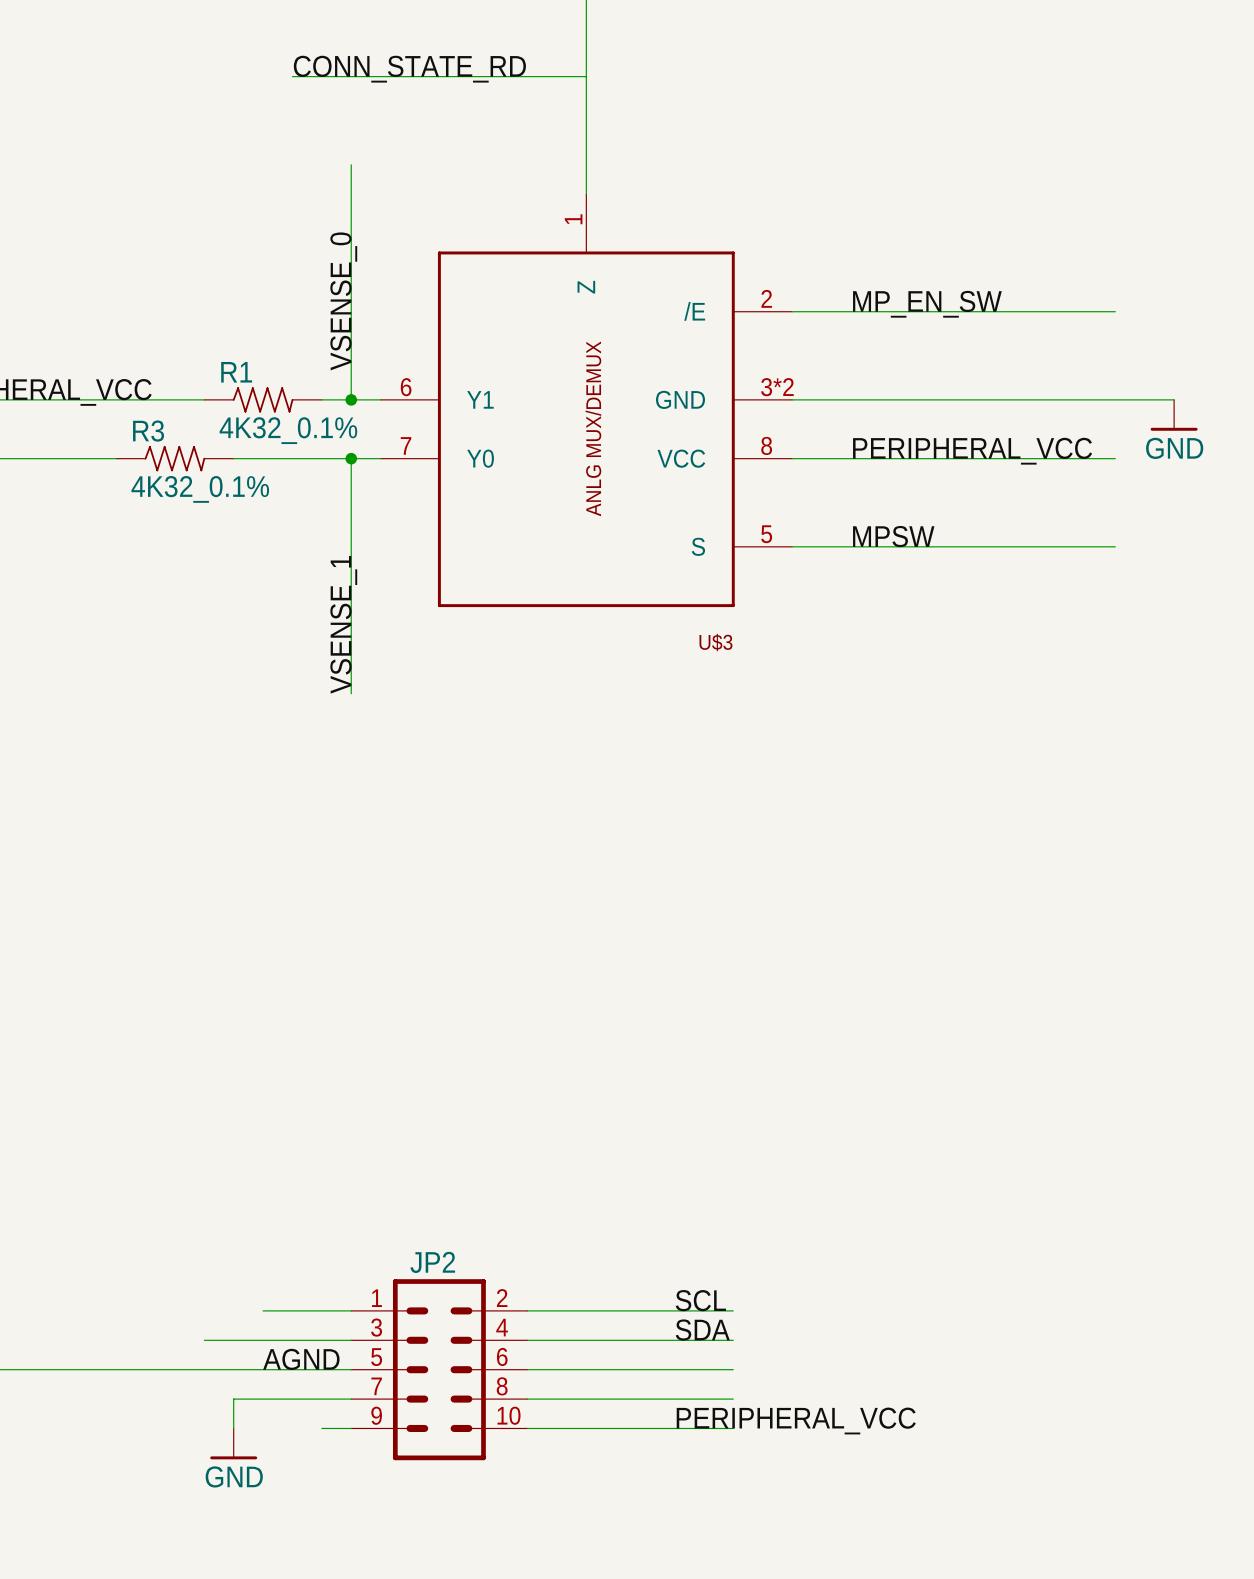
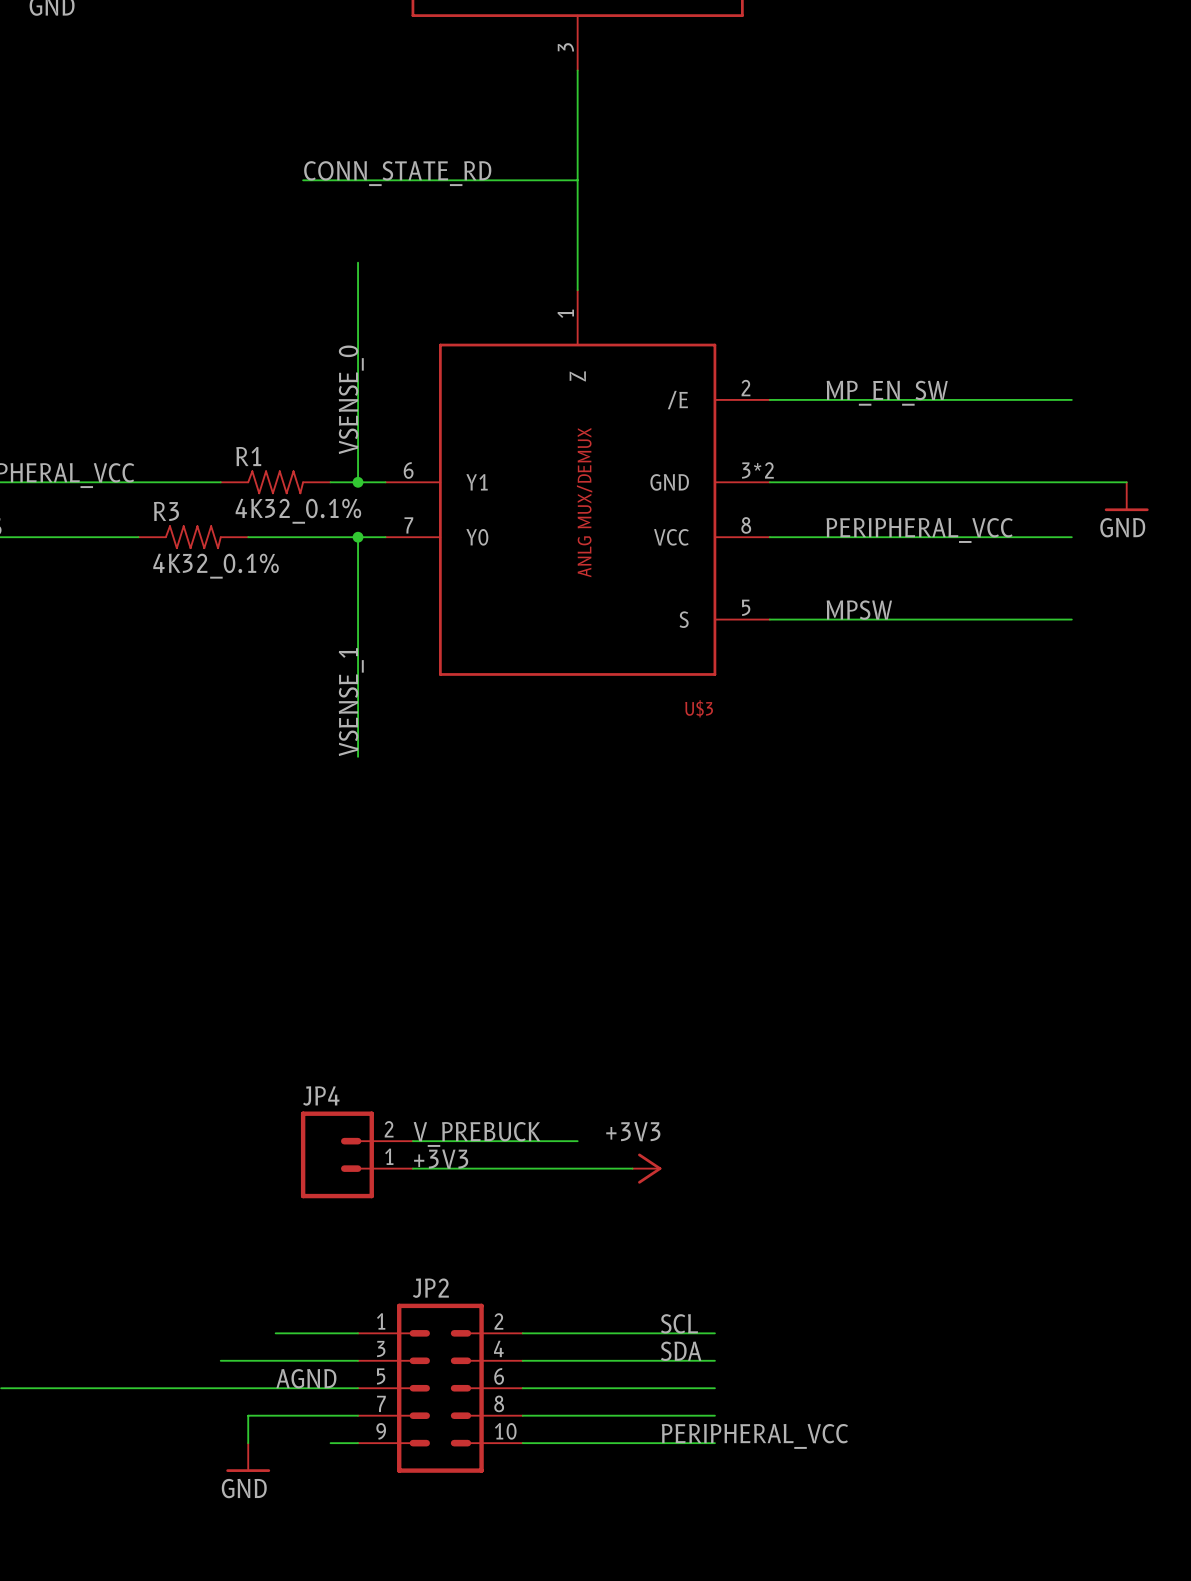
label: none -> V_PREBUCK (476, 1134)
wire: none -> (412, 1141) (577, 1141)
JP4: none -> (356, 1154)
label: none -> +3V3 (441, 1159)
wire: none -> (412, 1168) (632, 1168)
power symbol: none -> +3V3 (646, 1168)

